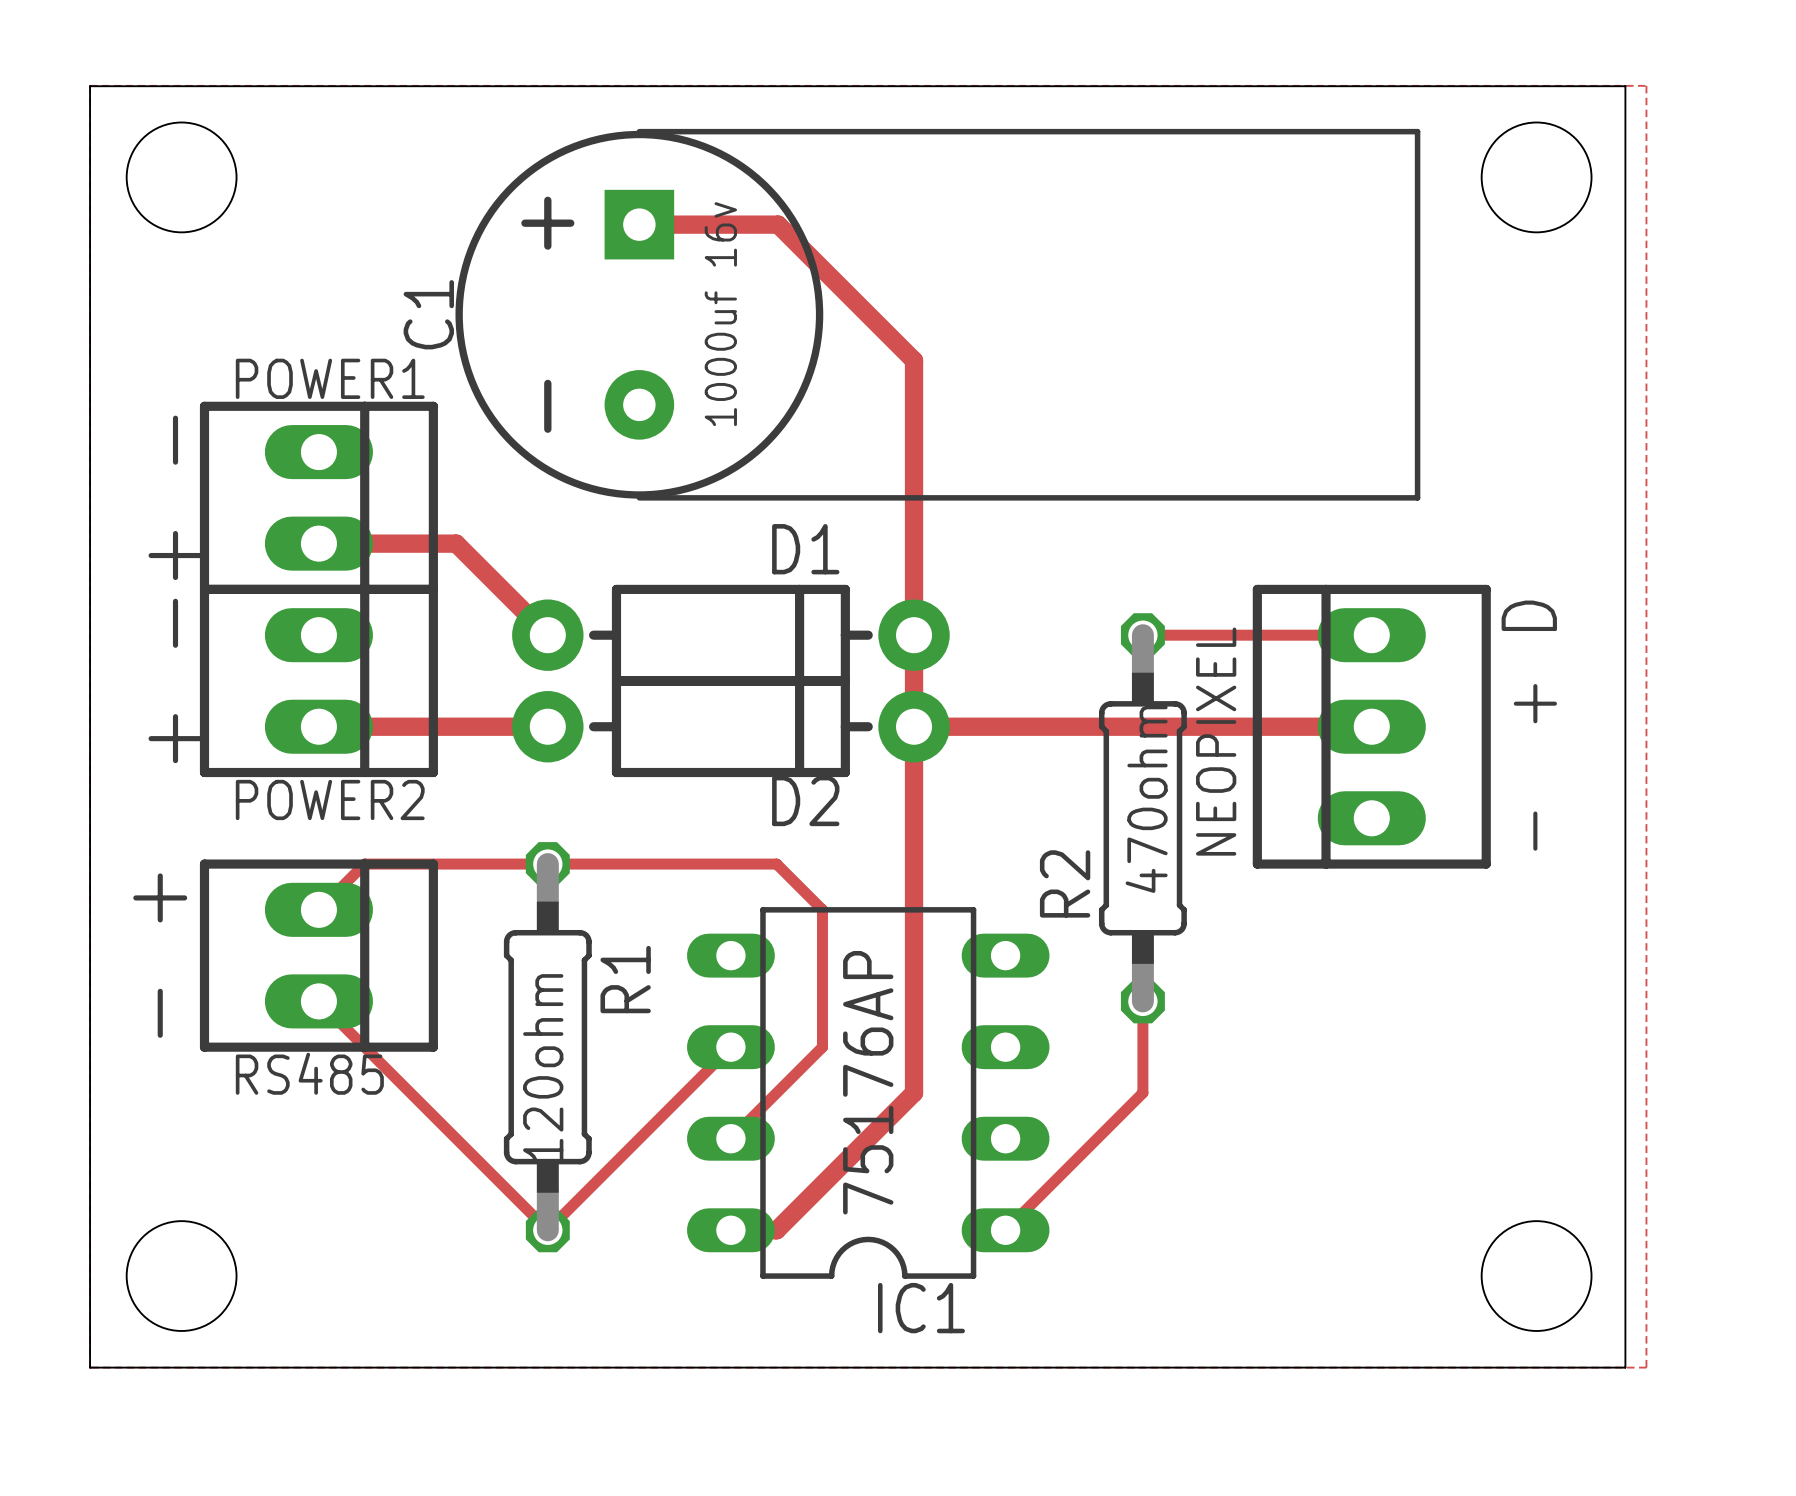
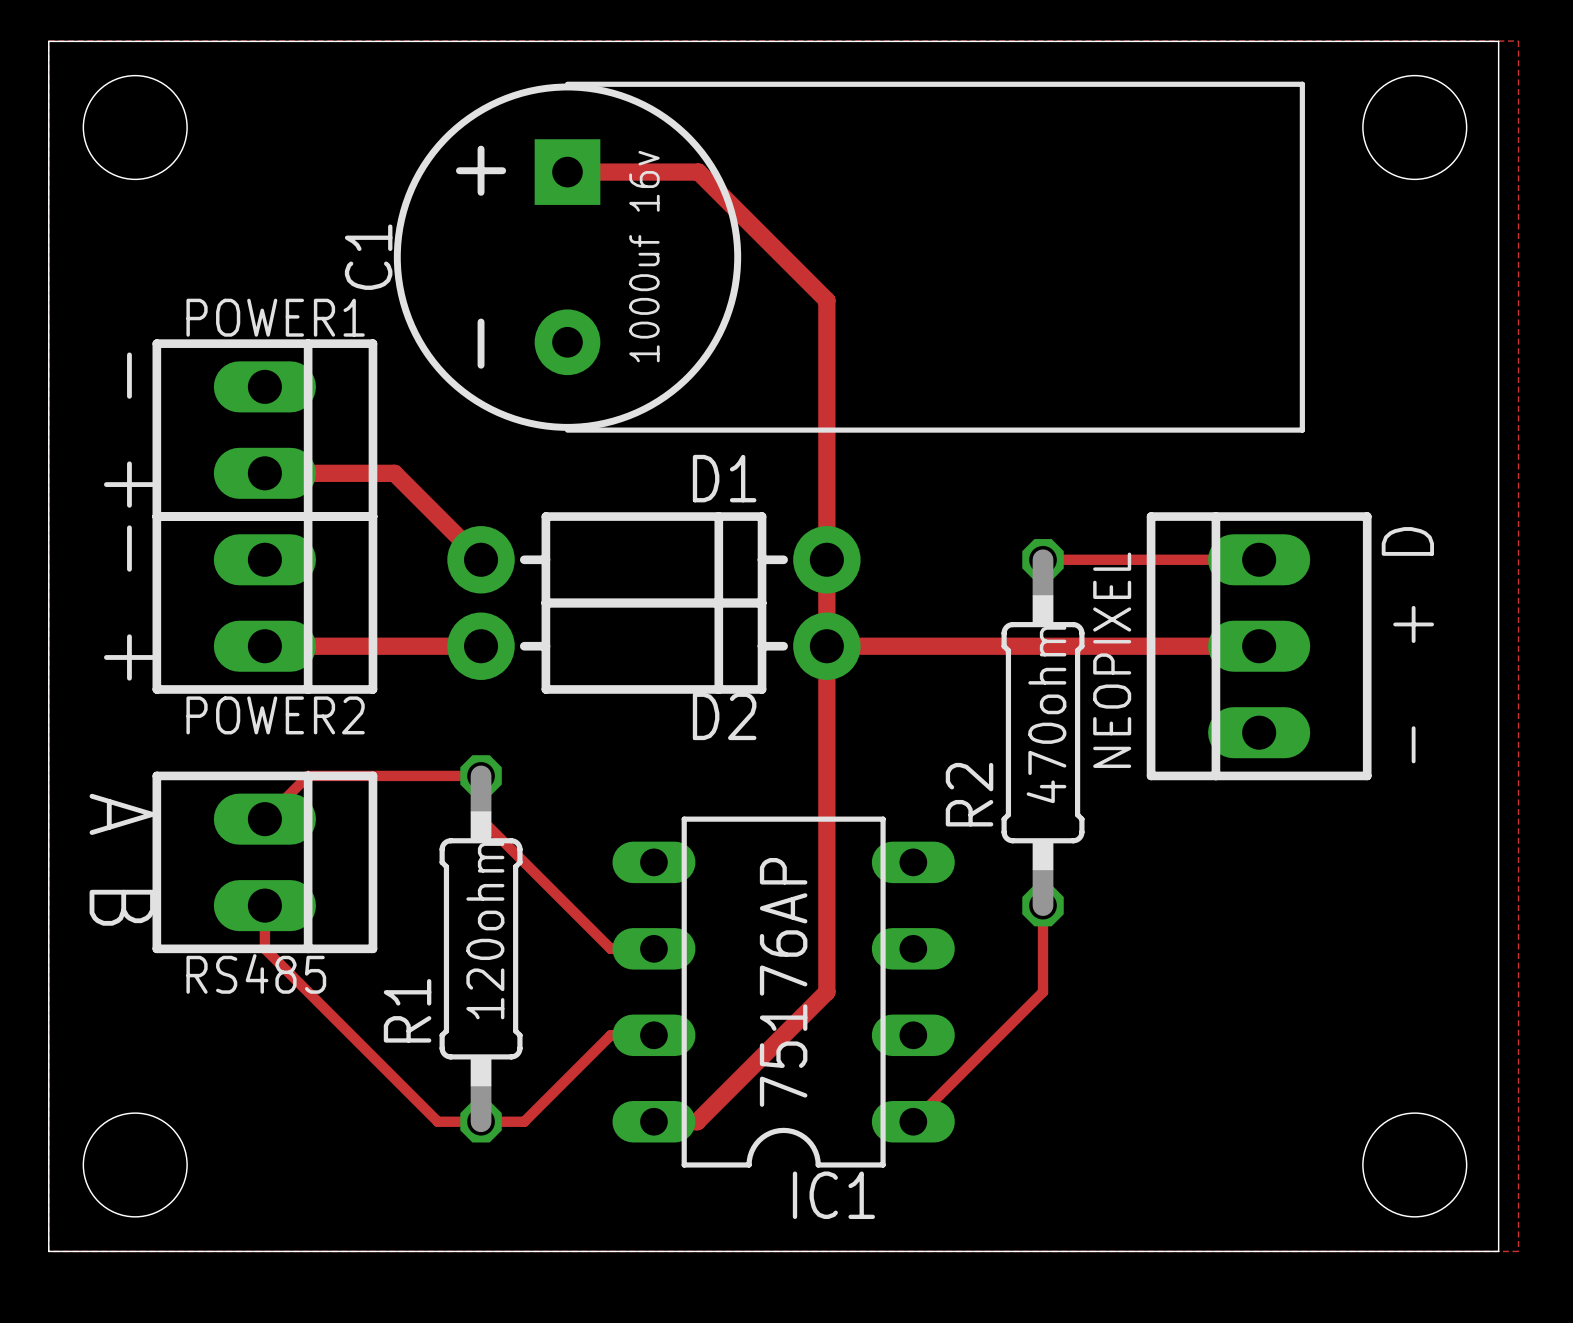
track: (547, 864) (776, 864) (822, 909) (822, 1047) (730, 1138) -> (481, 775) (481, 819) (610, 948) (653, 948)
text: + - (160, 955) -> A B (122, 859)
R1 name position: R1 (625, 979) -> R1 (407, 1010)
track: (318, 1001) (547, 1230) (730, 1047) -> (264, 905) (264, 948) (437, 1121) (524, 1121) (610, 1035) (653, 1035)
R1 value position: 120ohm (543, 1067) -> 120ohm (485, 930)

